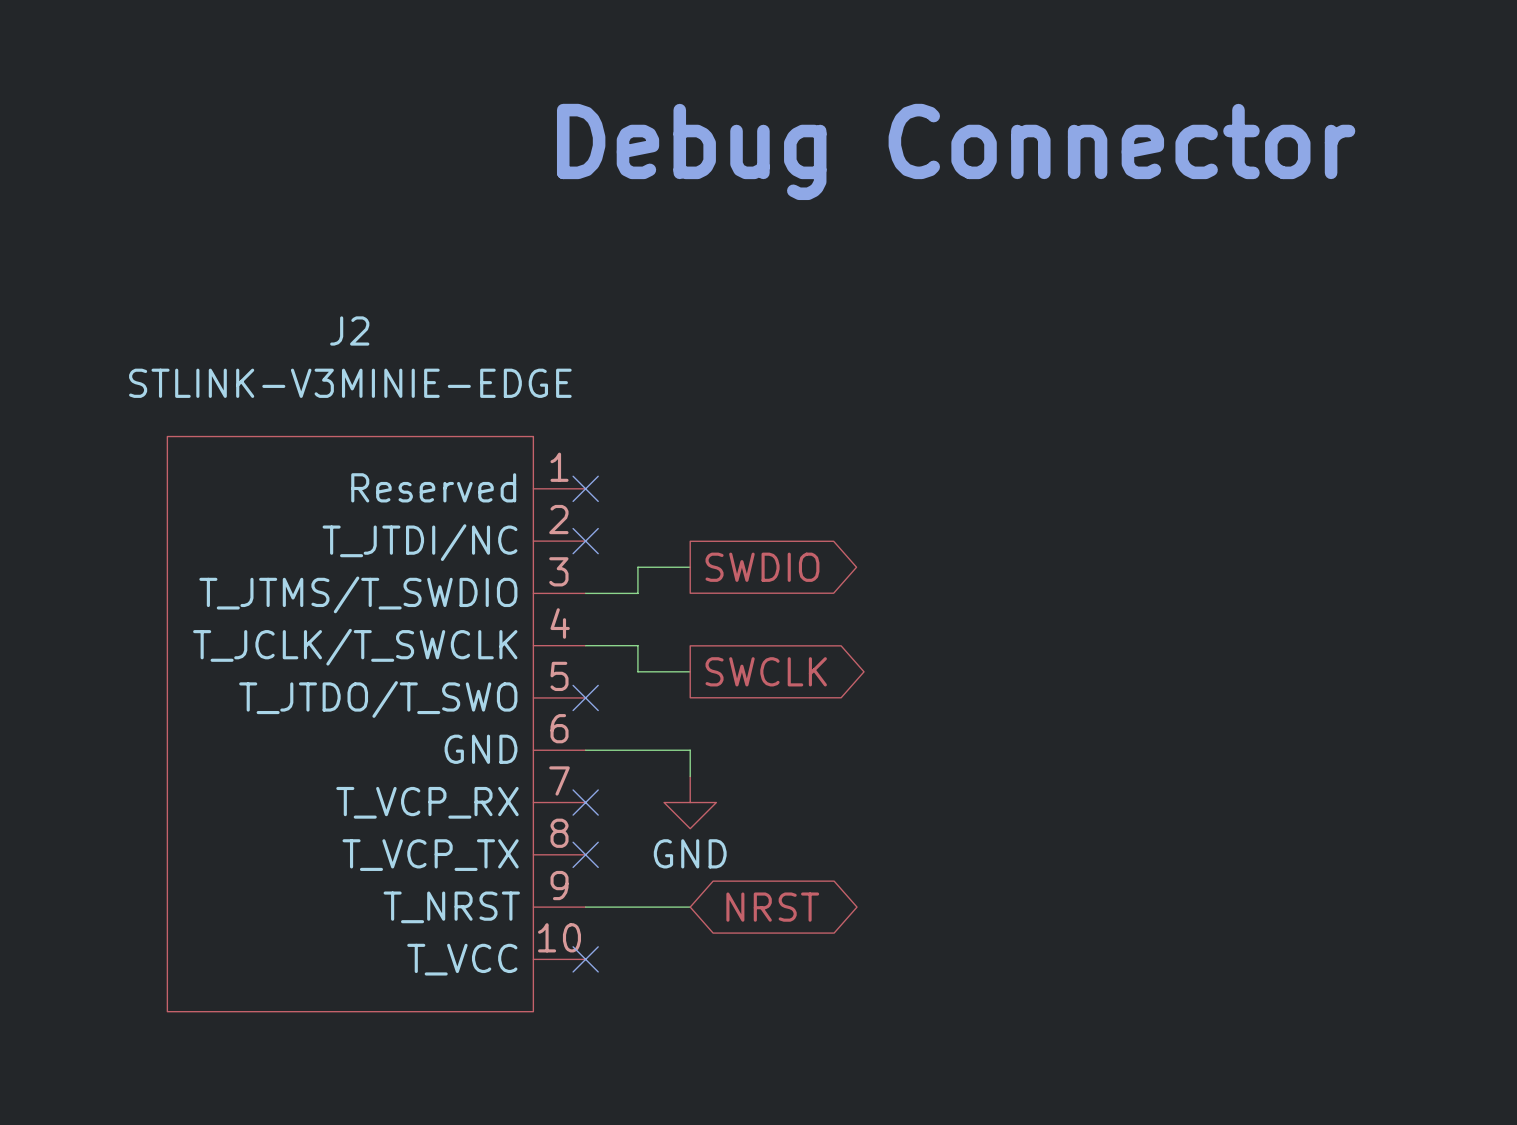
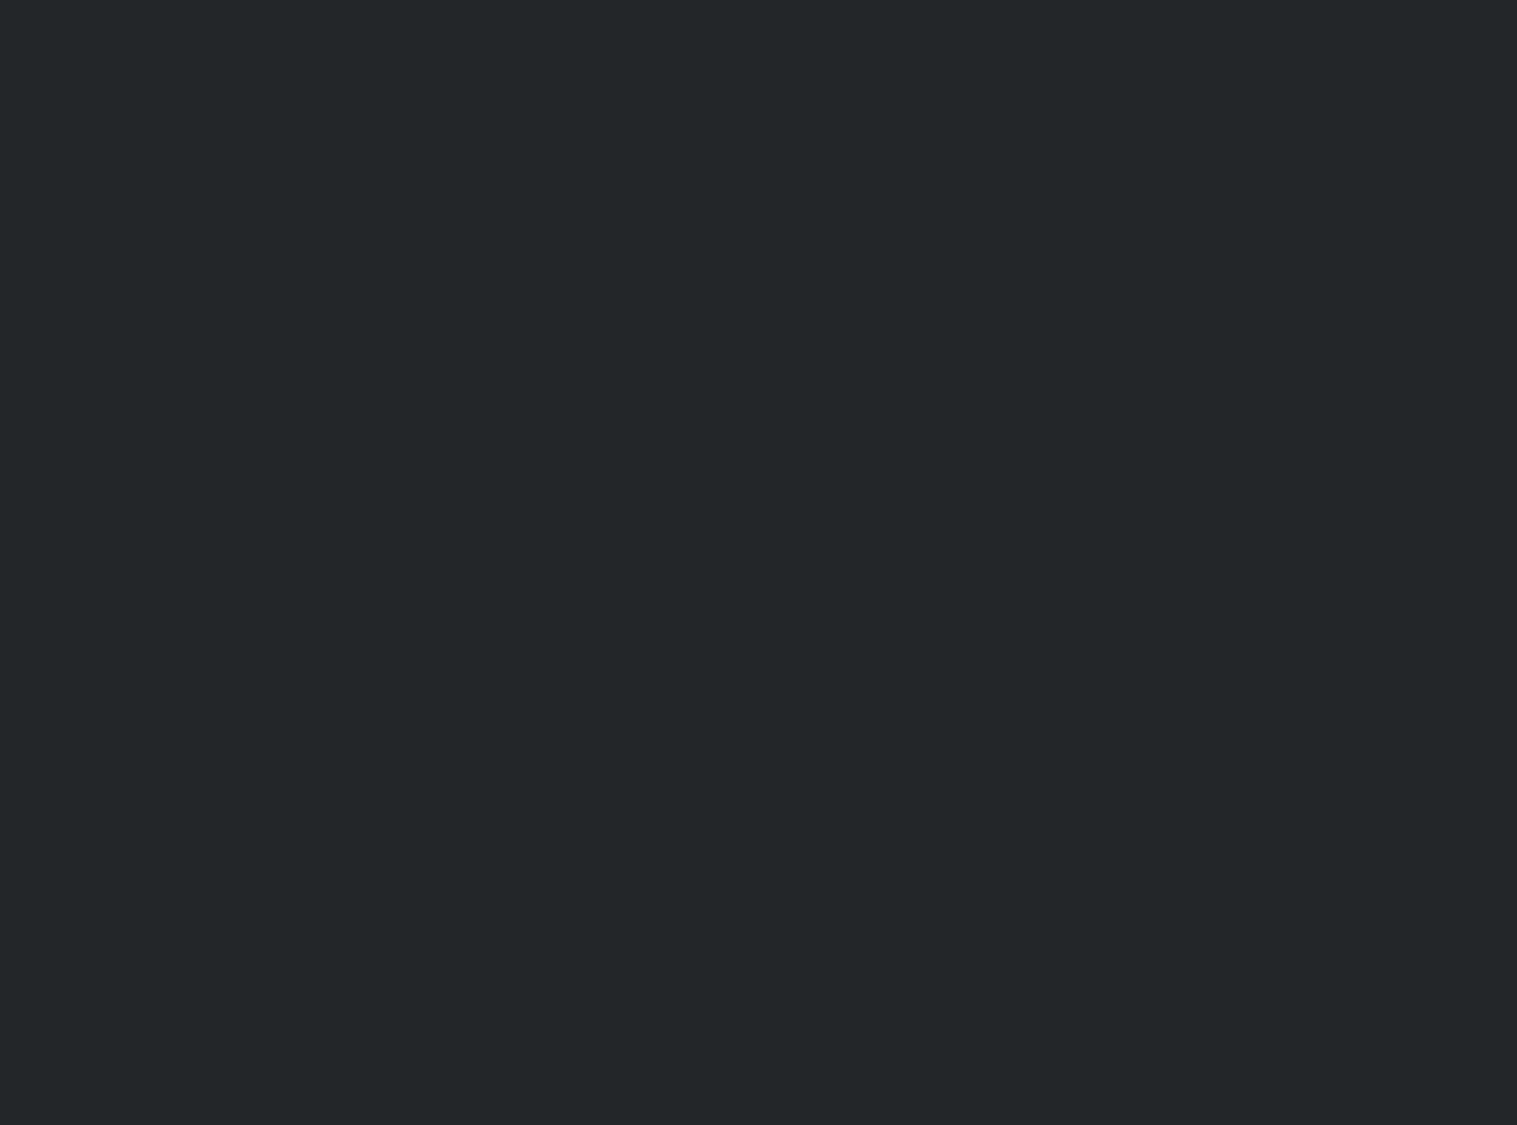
text: Debug Connector (956, 151) -> none
no-connect mark: (585, 488) -> none
no-connect mark: (585, 541) -> none
wire: (690, 567) (637, 567) (637, 593) (585, 593) -> none
global label: SWDIO (762, 567) -> none
wire: (585, 645) (637, 645) (637, 671) (690, 671) -> none
global label: SWCLK (766, 671) -> none
no-connect mark: (585, 697) -> none
J2: STLINK-V3MINIE-EDGE (376, 724) -> none
wire: (585, 750) (690, 750) (690, 776) -> none
no-connect mark: (585, 802) -> none
power symbol: GND (690, 802) -> none
no-connect mark: (585, 854) -> none
wire: (585, 907) (690, 907) -> none
global label: NRST (772, 907) -> none
no-connect mark: (585, 959) -> none

